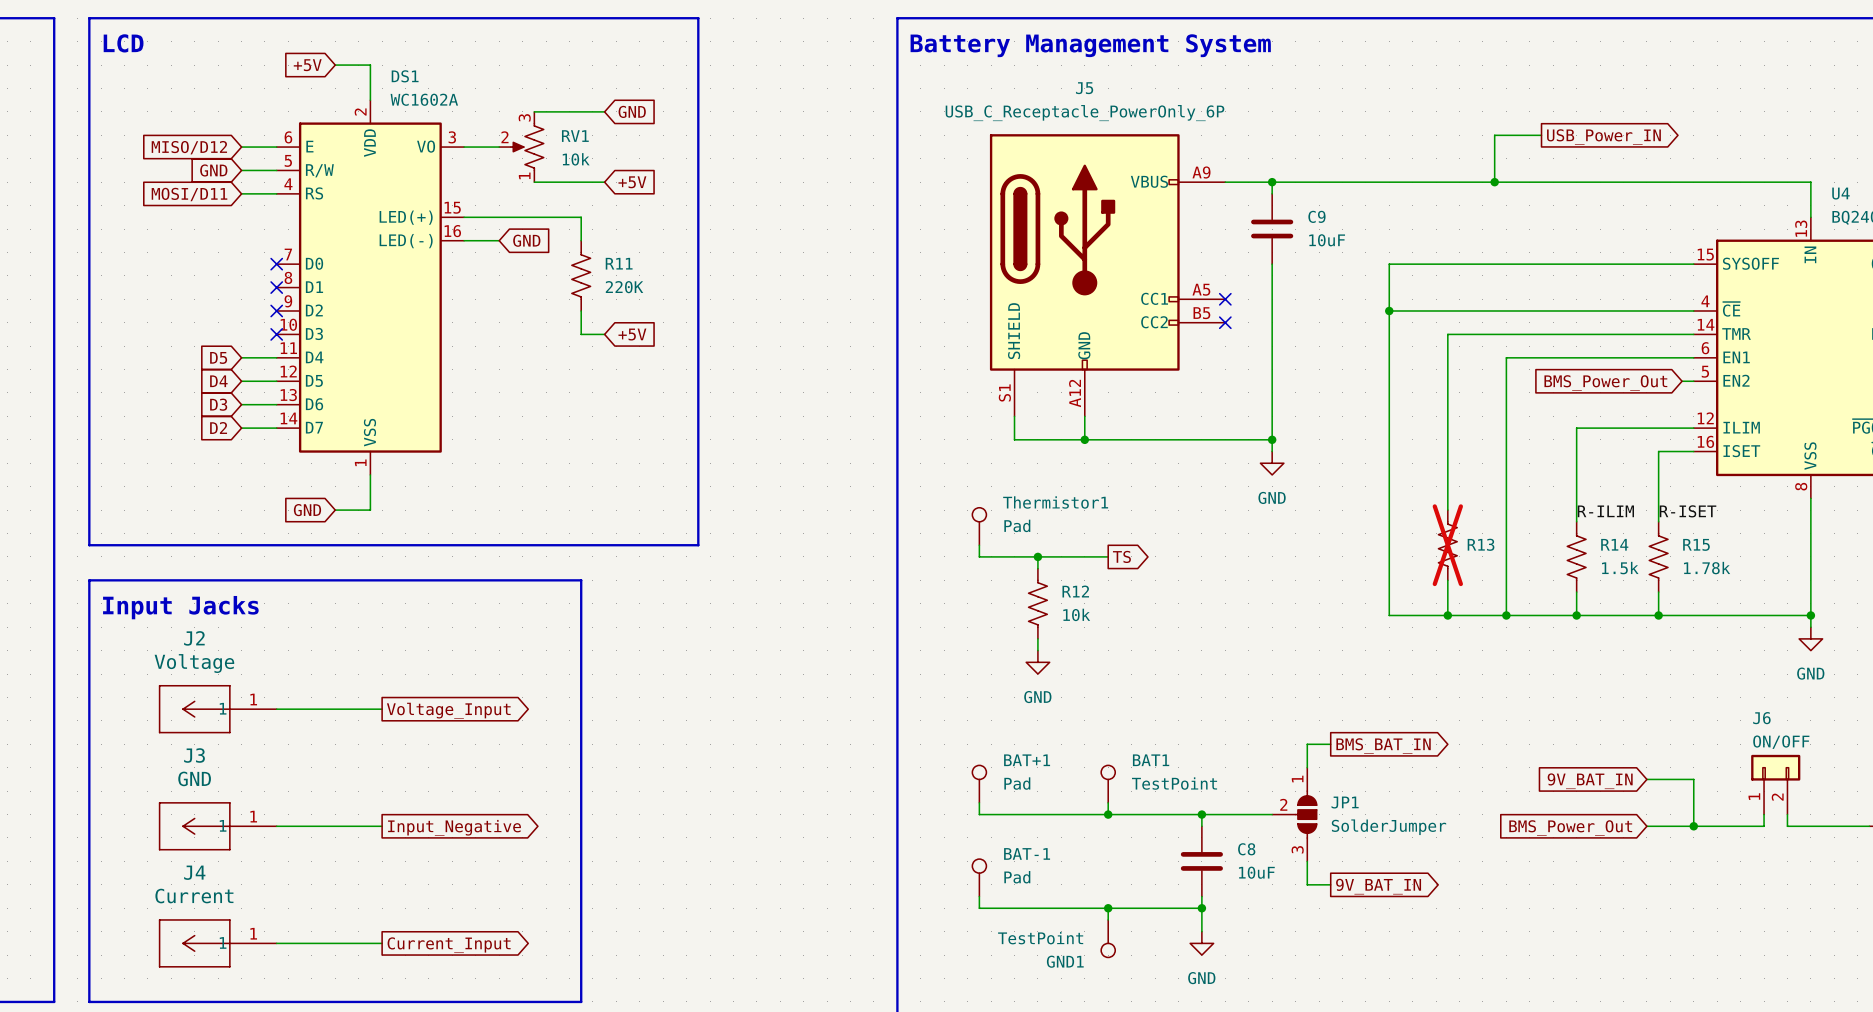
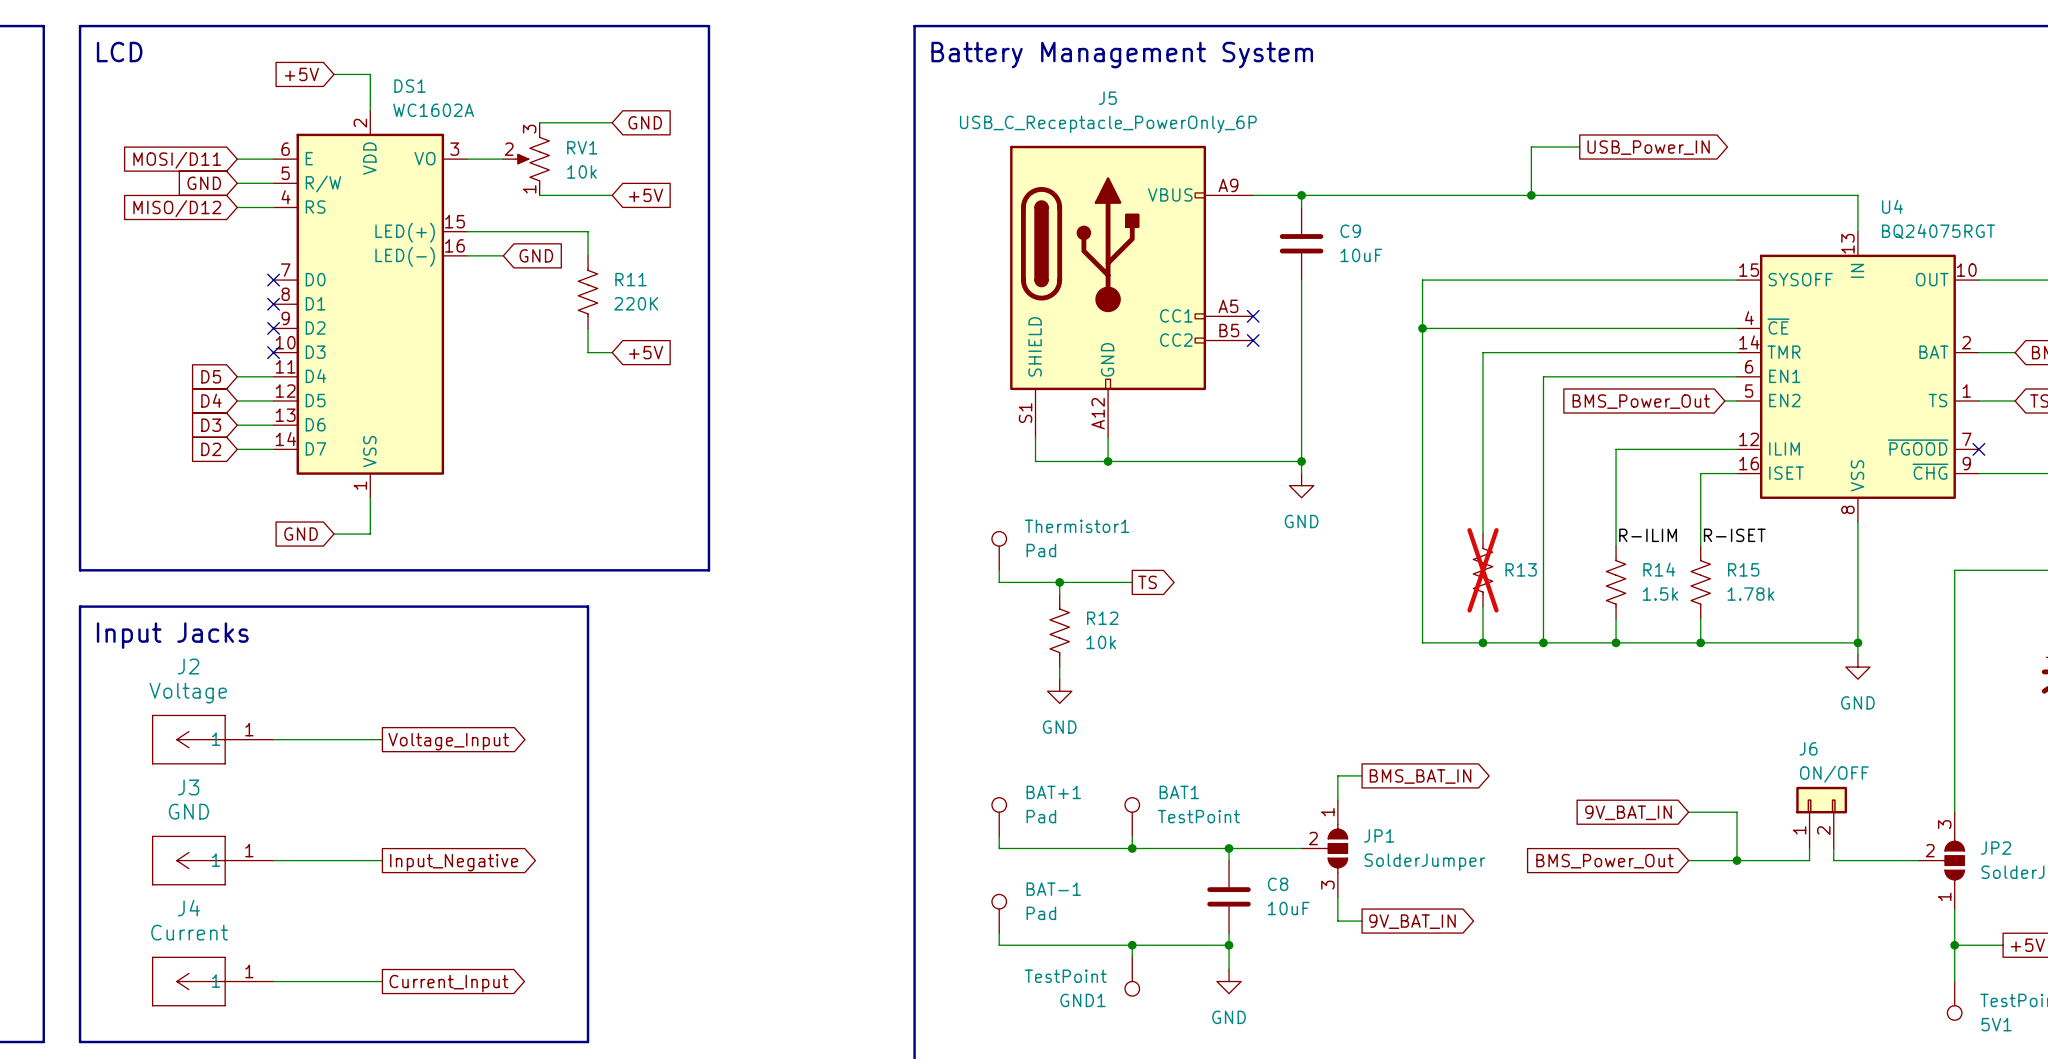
global label: MISO/D12 (189, 147) -> MOSI/D11 (177, 160)
global label: MOSI/D11 (189, 194) -> MISO/D12 (177, 208)

